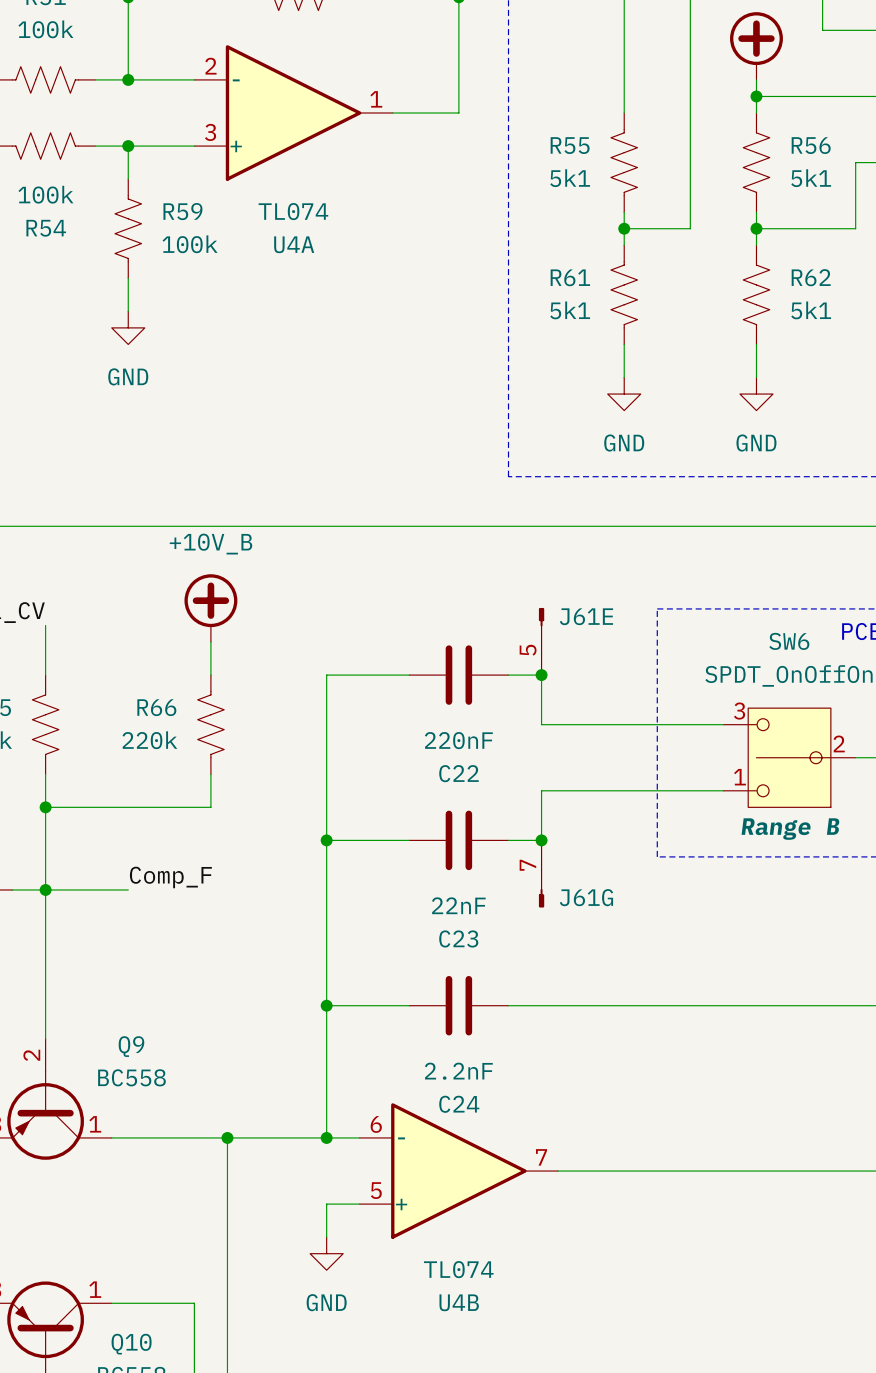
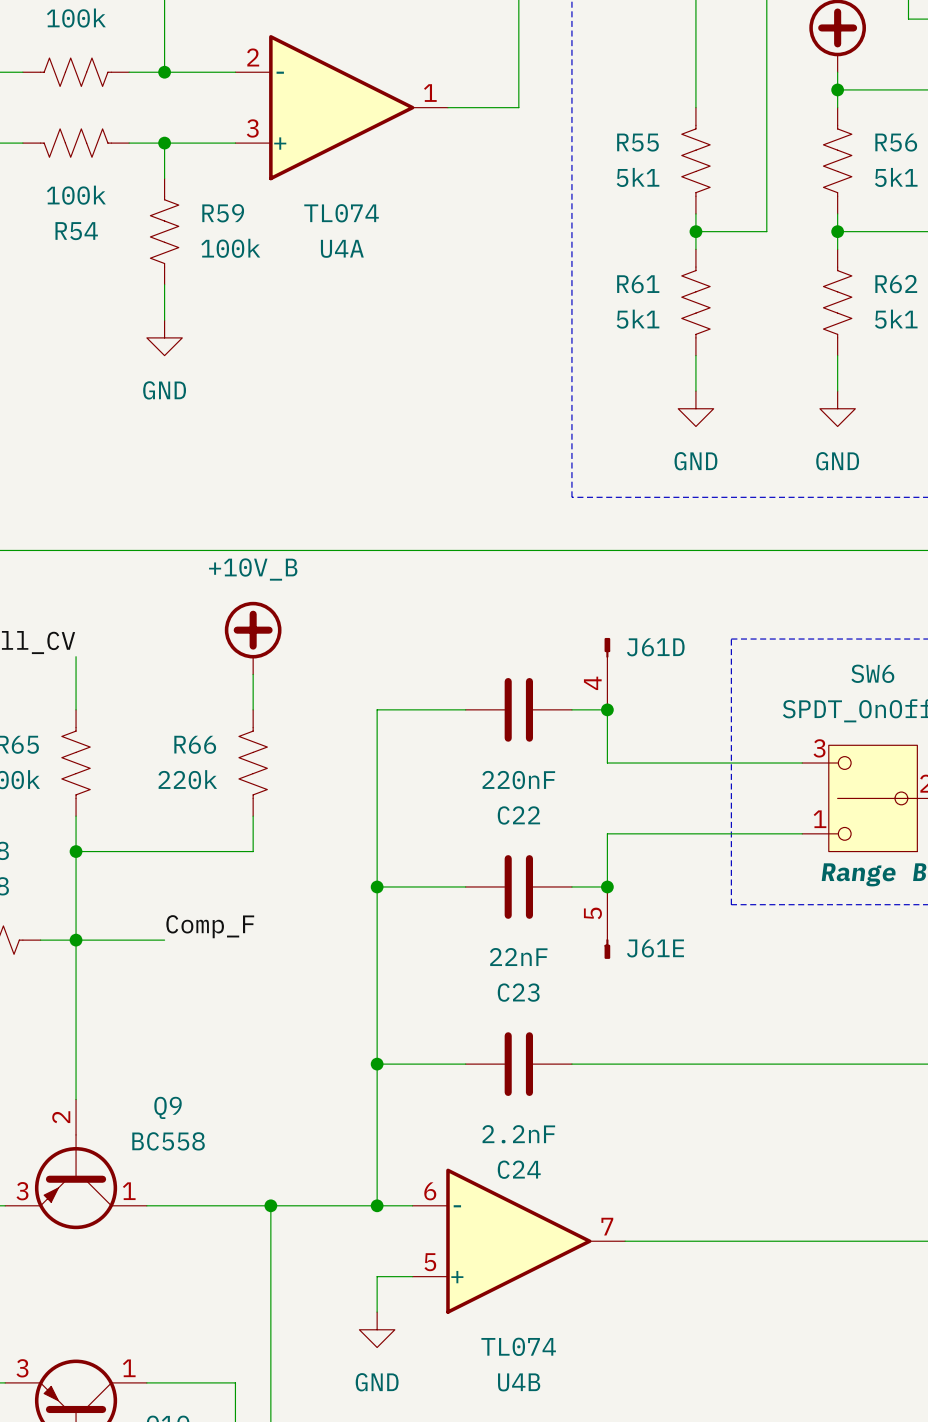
J61E name position: J61E (586, 616) -> J61E (655, 948)
J61E rotation: 0° (541, 617) -> 180° (607, 948)
J61E position: (541, 641) -> (607, 922)
J61D: none -> (607, 673)
J61G: (541, 873) -> none

